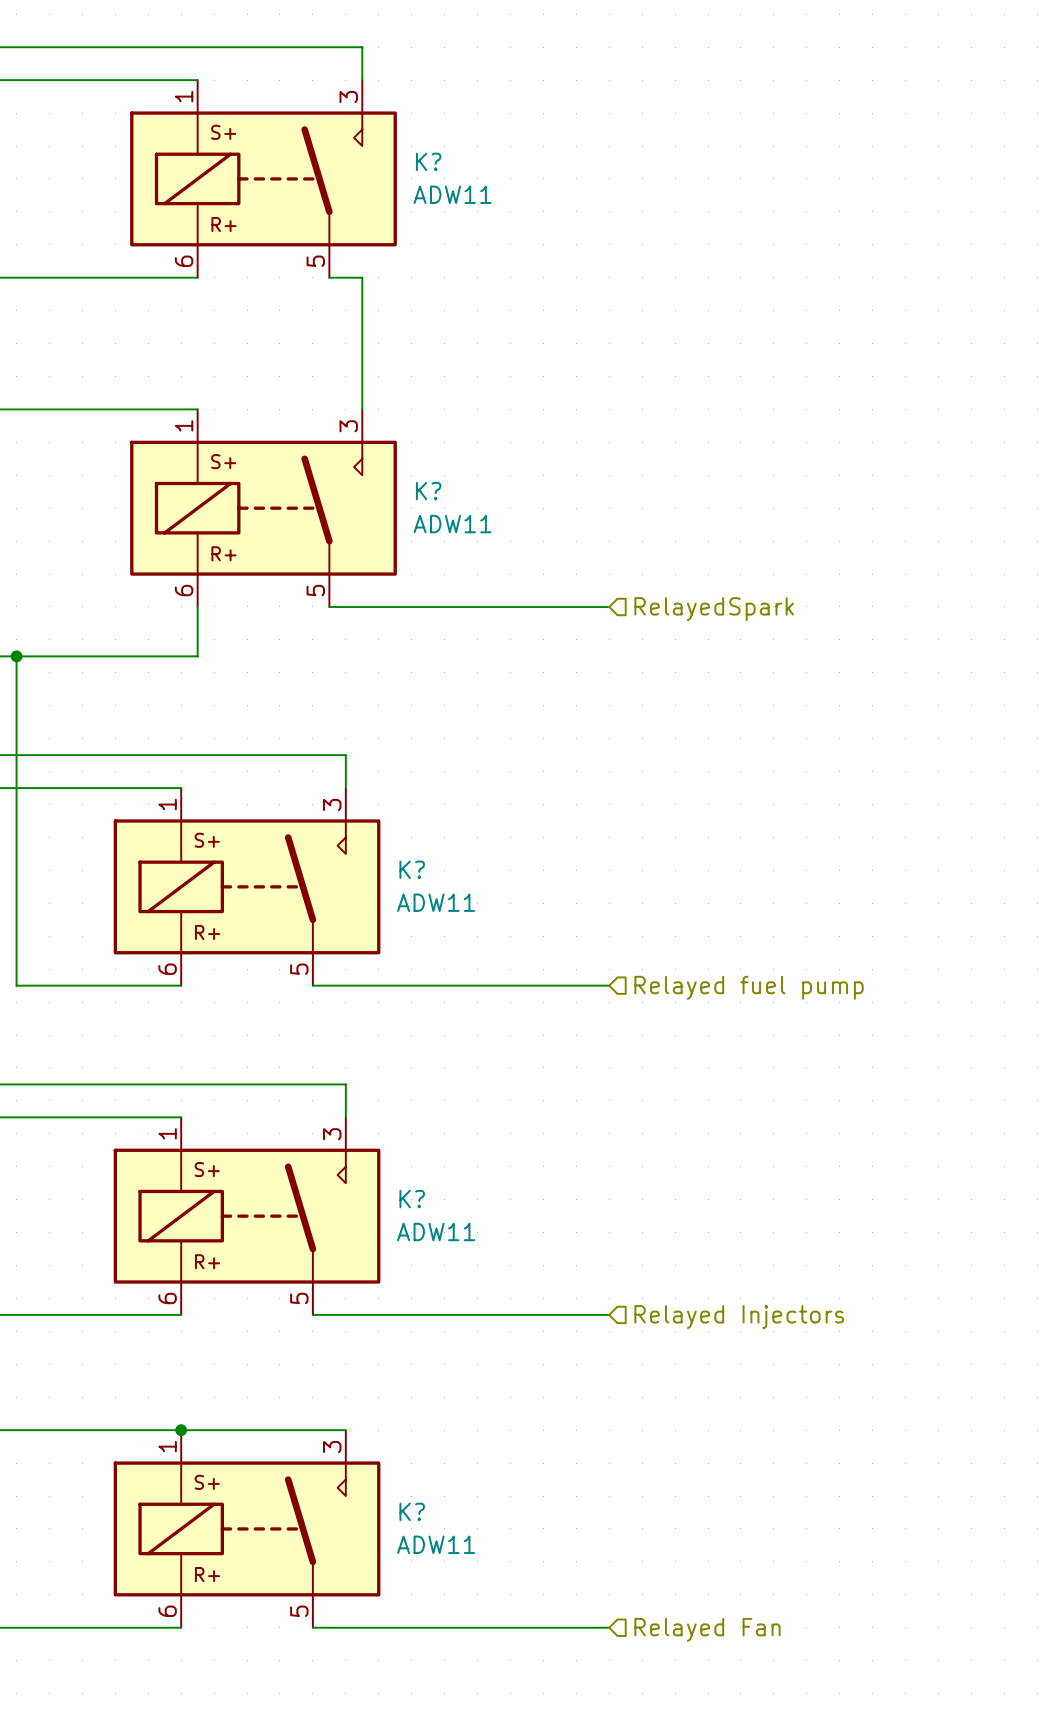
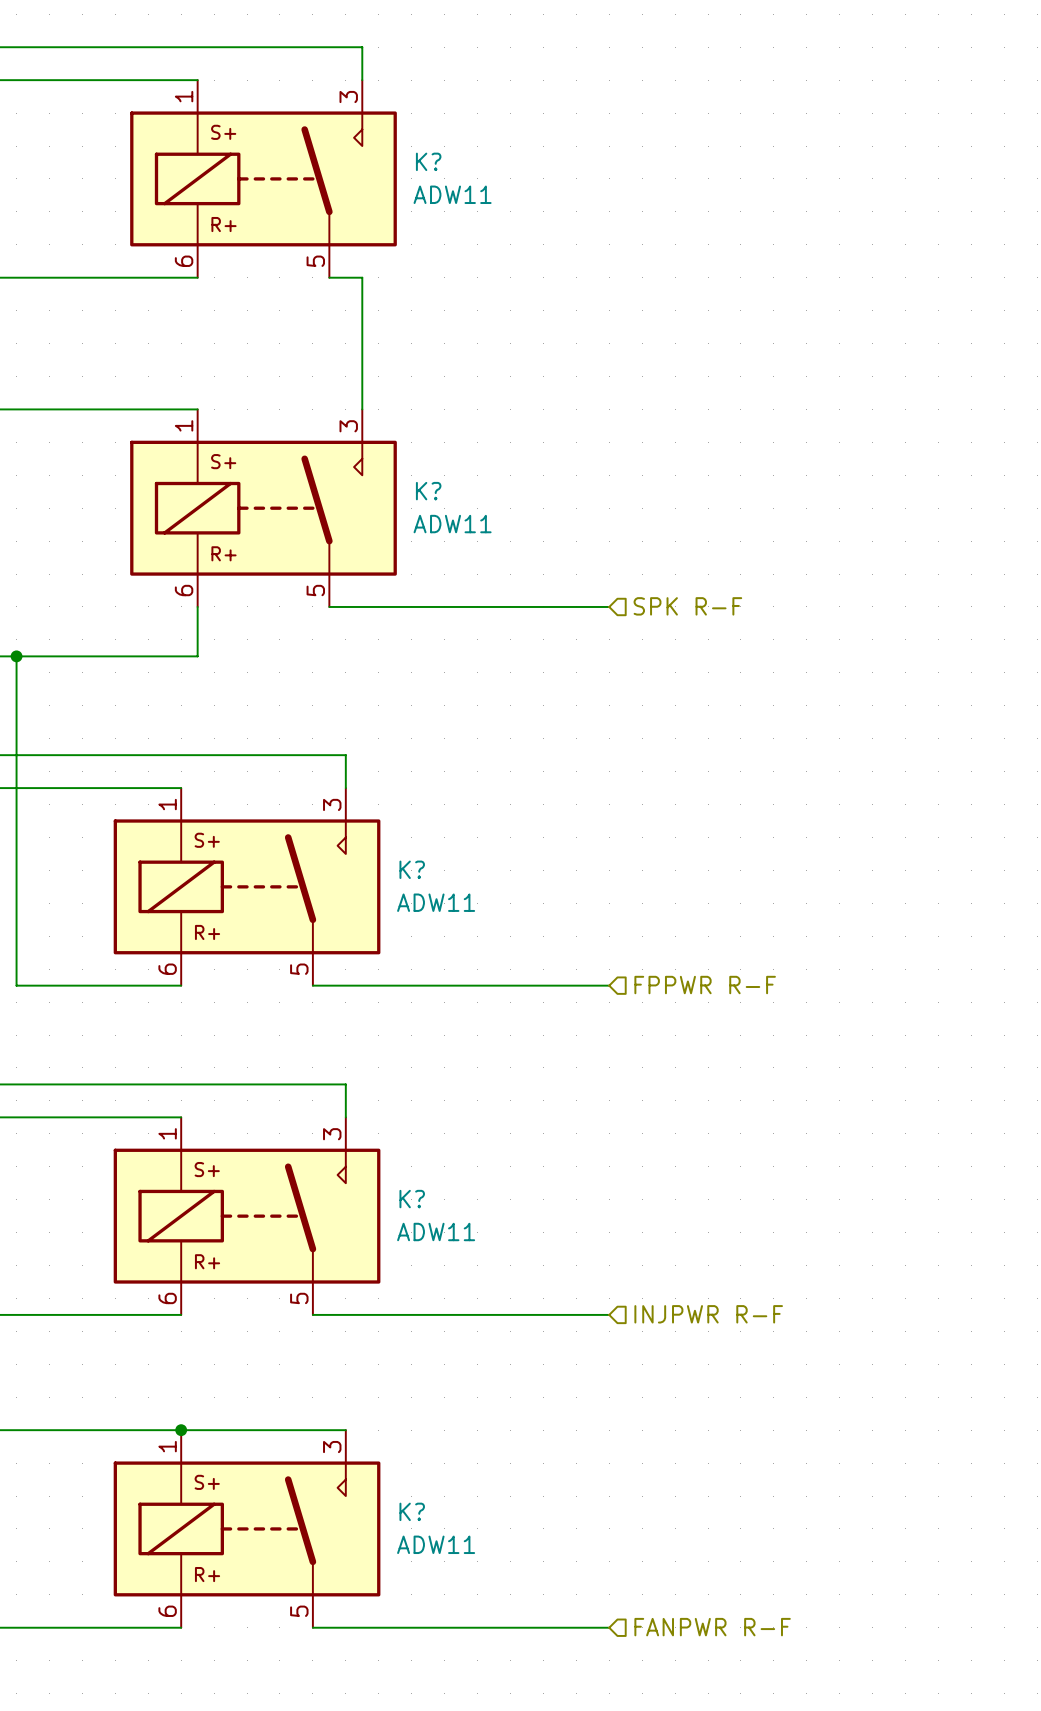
hierarchical label: RelayedSpark (714, 609) -> SPK R-F (687, 606)
hierarchical label: Relayed fuel pump (749, 987) -> FPPWR R-F (705, 985)
hierarchical label: Relayed Injectors (739, 1317) -> INJPWR R-F (708, 1314)
hierarchical label: Relayed Fan (707, 1629) -> FANPWR R-F (712, 1627)

